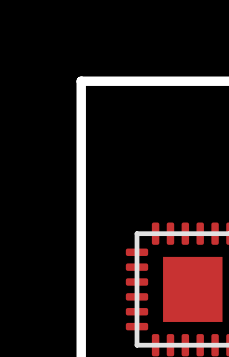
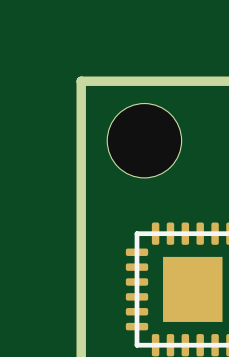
hole: none -> (144, 140)

